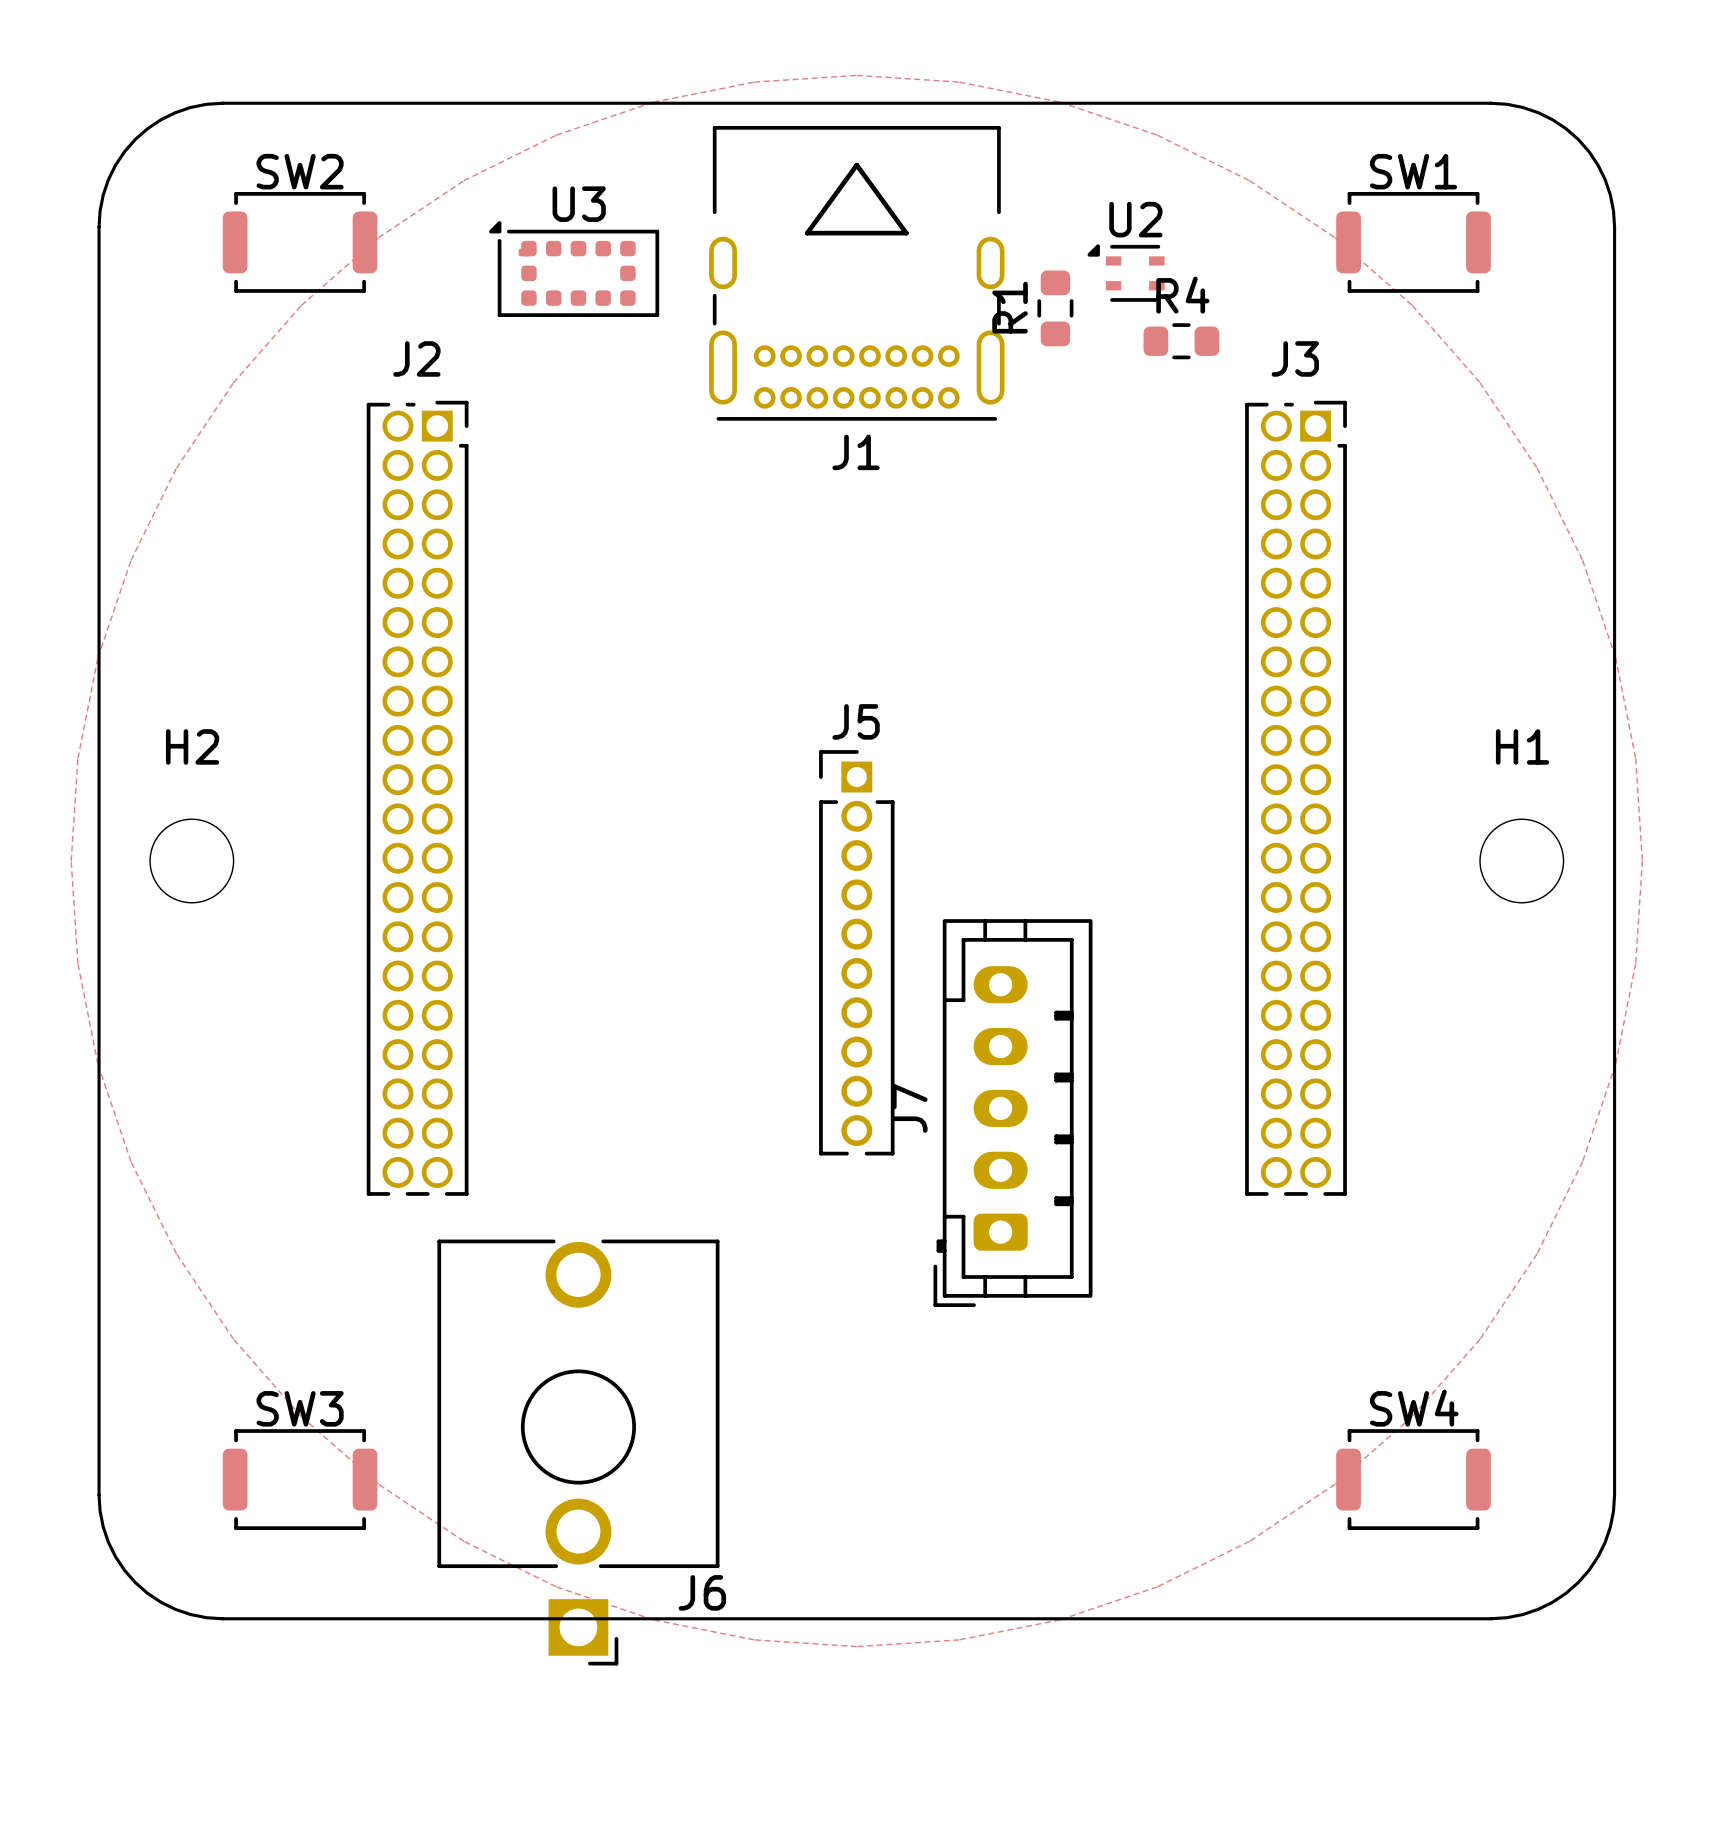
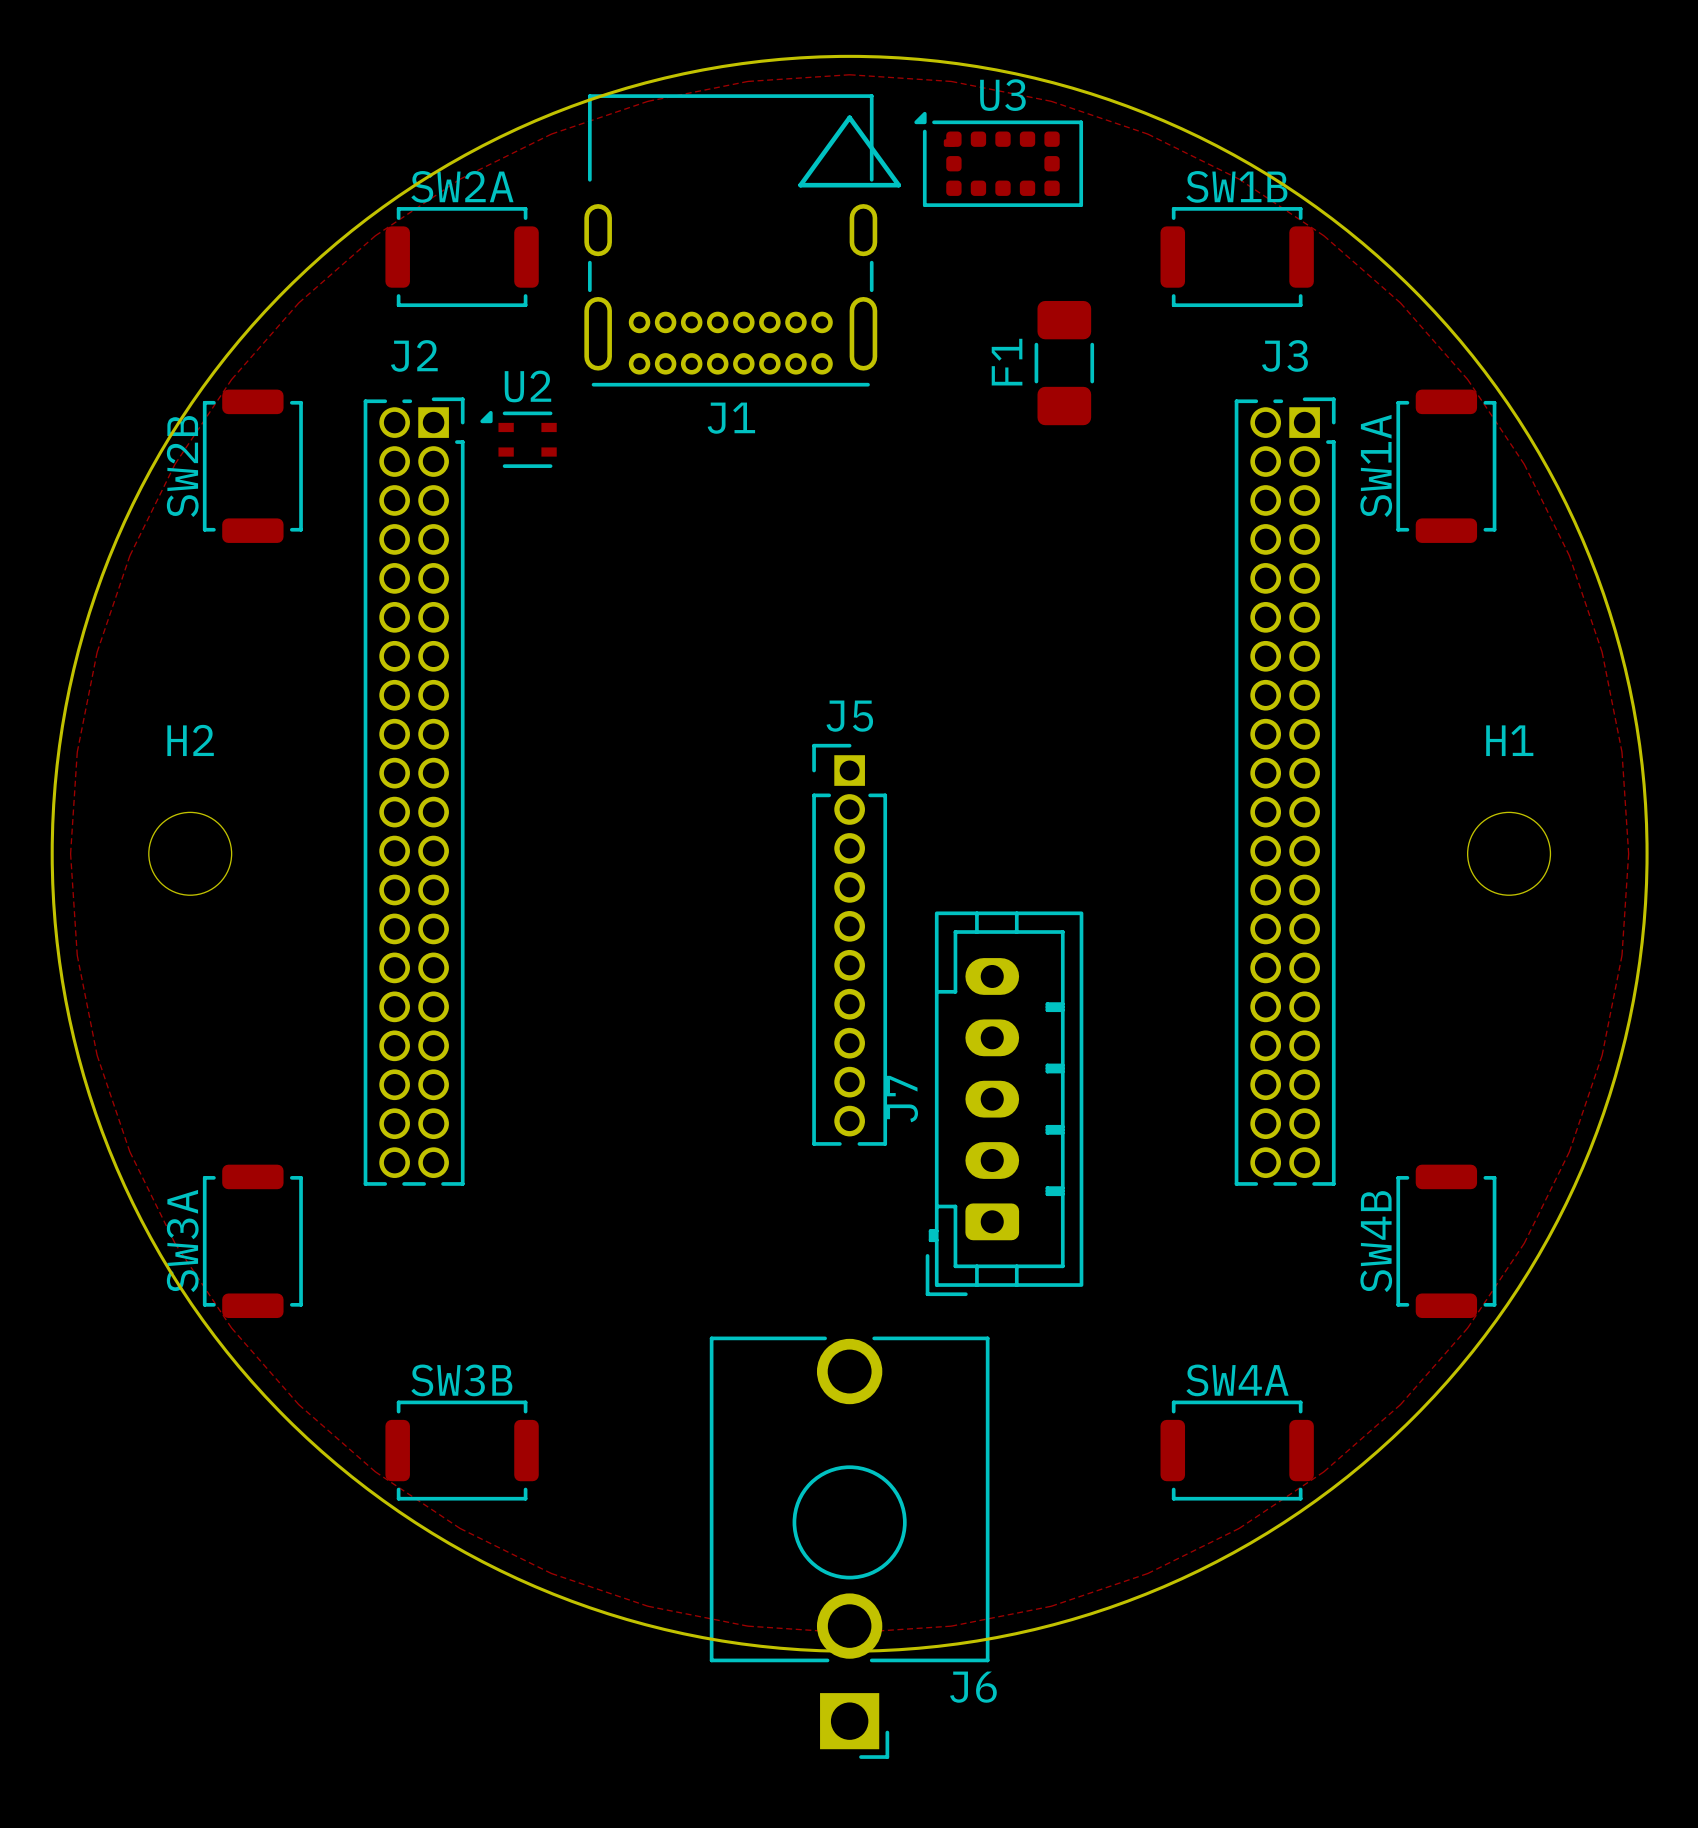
round board edge: none -> [50, 54, 1649, 1653]
board edge: (222, 103) (1490, 103) (1522, 107) (1538, 112) (1566, 128) (1578, 139) (1589, 151) (1605, 179) (1610, 194) (1614, 226) (1614, 1495) (1610, 1527) (1605, 1542) (1589, 1570) (1578, 1582) (1566, 1593) (1538, 1609) (1522, 1614) (1490, 1618) (222, 1618) (190, 1614) (175, 1609) (147, 1593) (135, 1582) (124, 1570) (108, 1542) (103, 1527) (99, 1495) (99, 226) (103, 194) (108, 179) (124, 151) (135, 139) (147, 128) (175, 112) (190, 107) (222, 103) -> none
line: (856, 165) (807, 233) (906, 233) (856, 165) -> (849, 117) (800, 185) (898, 185) (849, 117)
SW2: (300, 242) -> none
SW1: (1413, 242) -> none
SW2A: none -> (462, 257)
SW1B: none -> (1237, 257)
U3 position: (574, 269) -> (998, 159)
J1 position: (856, 273) -> (730, 240)
U2 position: (1126, 273) -> (518, 439)
R1: (1055, 308) -> none
R4: (1181, 341) -> none
F1: none -> (1064, 363)
SW2B: none -> (252, 466)
SW1A: none -> (1446, 466)
SW3A: none -> (252, 1241)
SW4B: none -> (1446, 1241)
J6 position: (578, 1452) -> (849, 1547)
SW3B: none -> (462, 1450)
SW4A: none -> (1237, 1450)
SW3: (300, 1479) -> none
SW4: (1413, 1479) -> none

